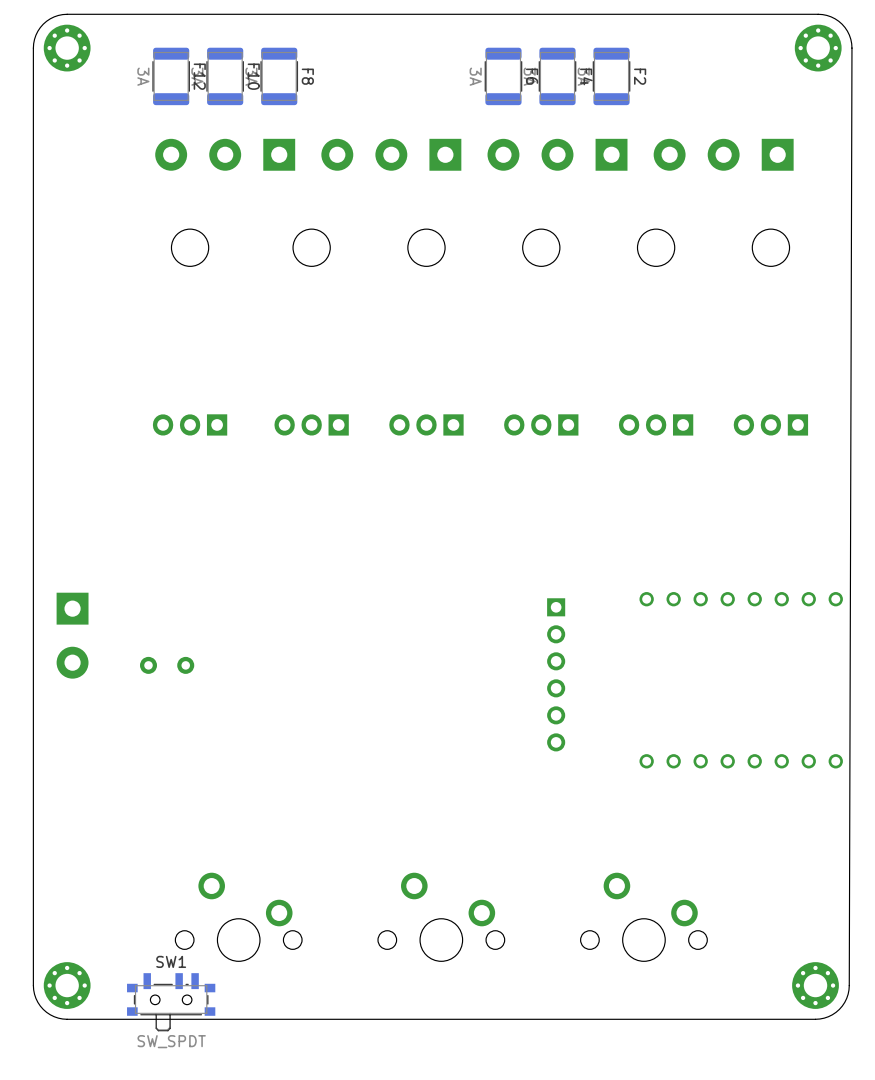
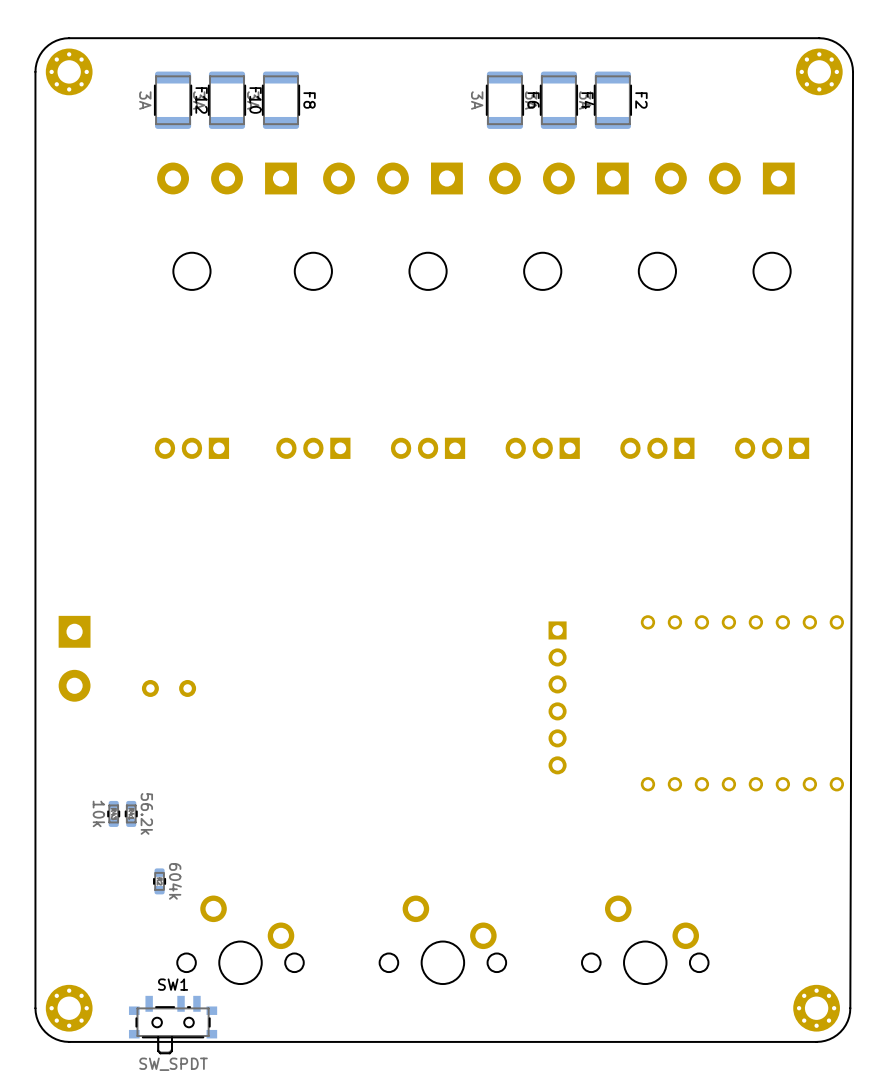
part: none -> 10k (113, 813)
part: none -> 56.2k (131, 813)
part: none -> 604k (159, 881)

